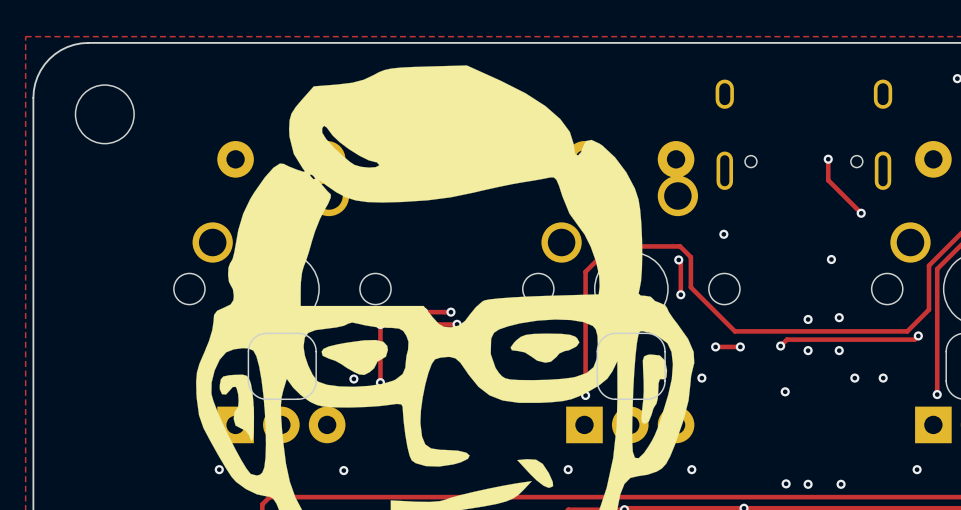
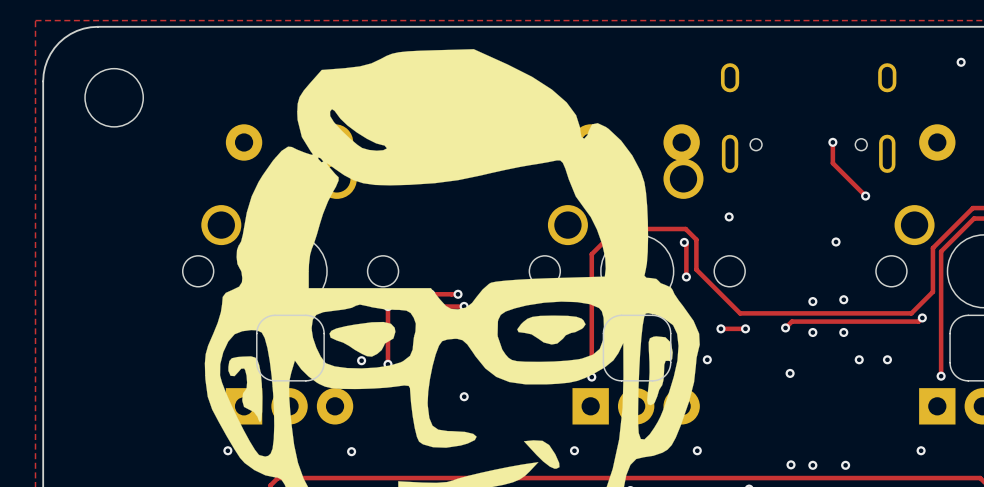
via: none -> (464, 396)

